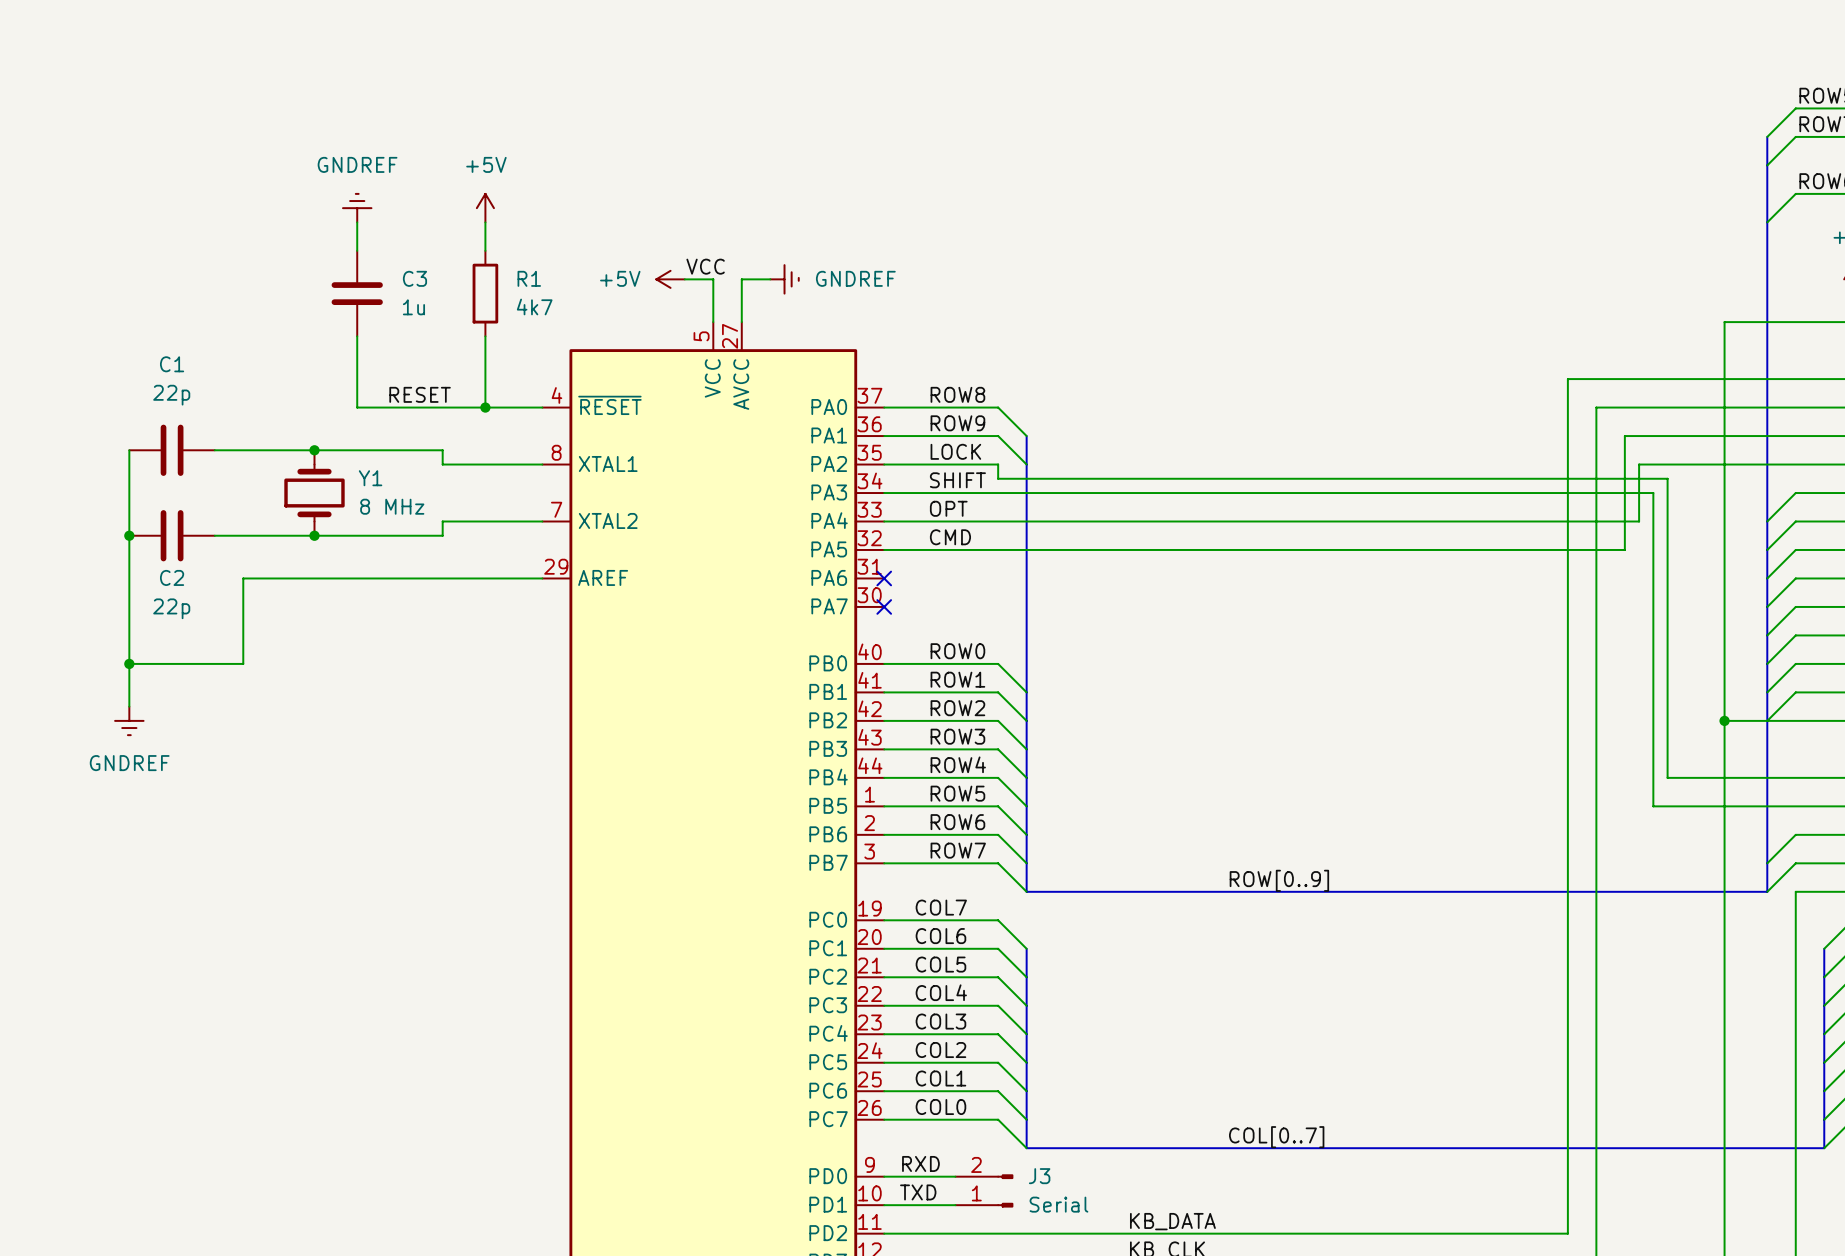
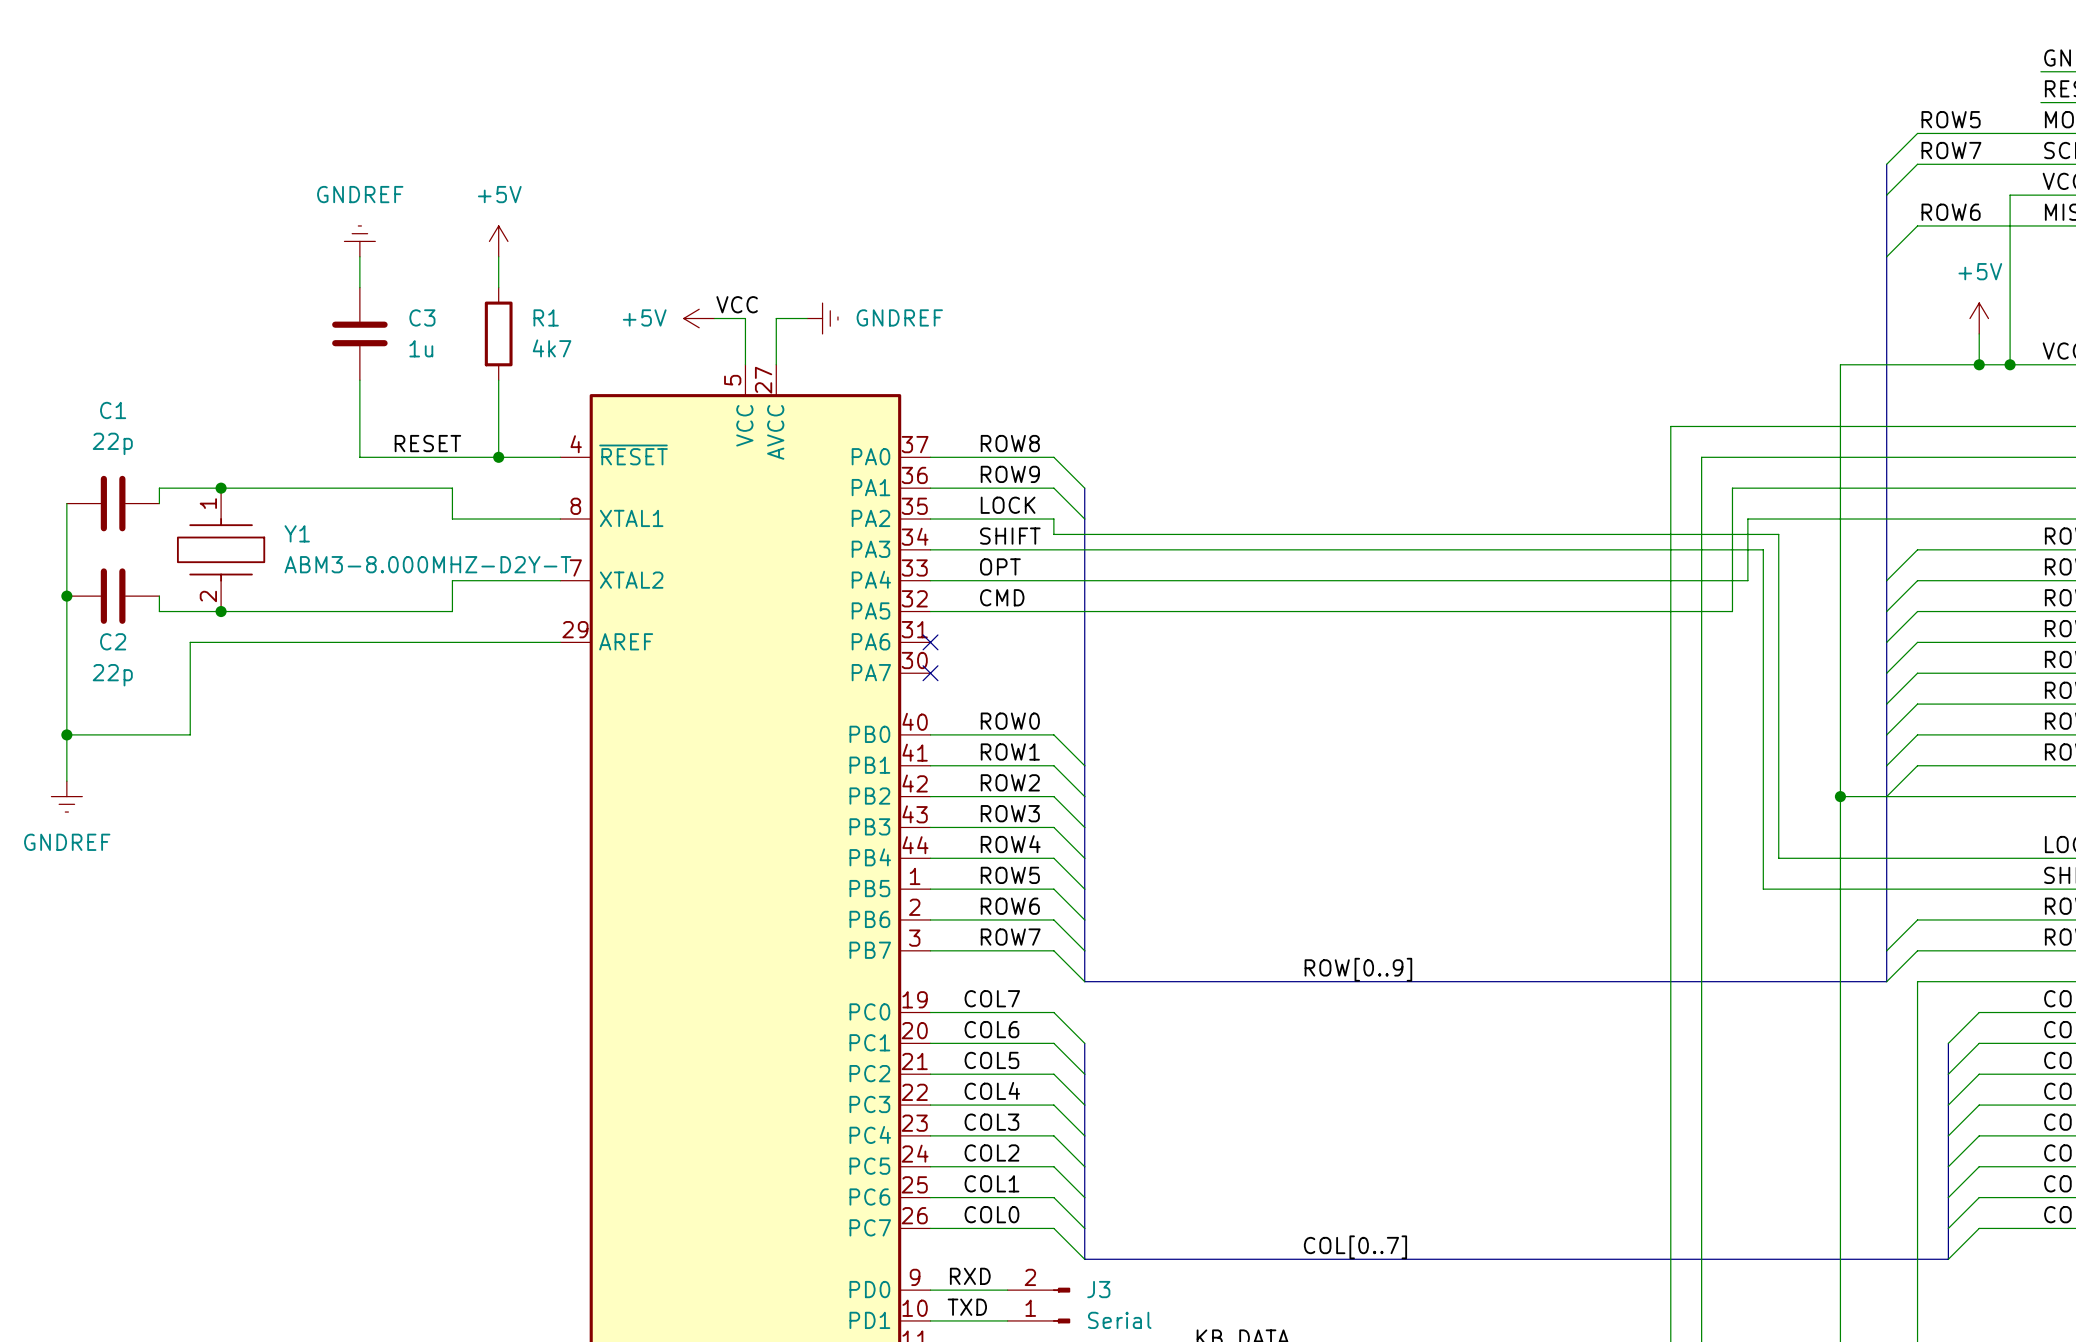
junction: none -> (221, 488)
wire: (129, 450) (129, 706) -> (66, 503) (66, 781)
C1 position: (172, 450) -> (113, 503)
wire: (214, 450) (442, 450) -> (159, 503) (159, 488) (452, 488) (452, 503)
Y1 symbol: [284, 450, 345, 536] -> [176, 488, 266, 612]
junction: (314, 450) -> none
Y1 value: 8 MHz (392, 506) -> ABM3-8.000MHZ-D2Y-T (427, 564)
junction position: (129, 535) -> (66, 596)
C2 position: (172, 535) -> (113, 596)
wire: (214, 535) (442, 535) -> (159, 596) (159, 611) (452, 611) (452, 596)
junction: (314, 535) -> none
junction: none -> (221, 611)
wire: (243, 578) (243, 663) (200, 663) -> (236, 642) (190, 642) (190, 734)
wire: none -> (66, 734) (113, 734)
junction position: (129, 663) -> (66, 734)
power symbol position: GNDREF (129, 720) -> GNDREF (66, 796)

